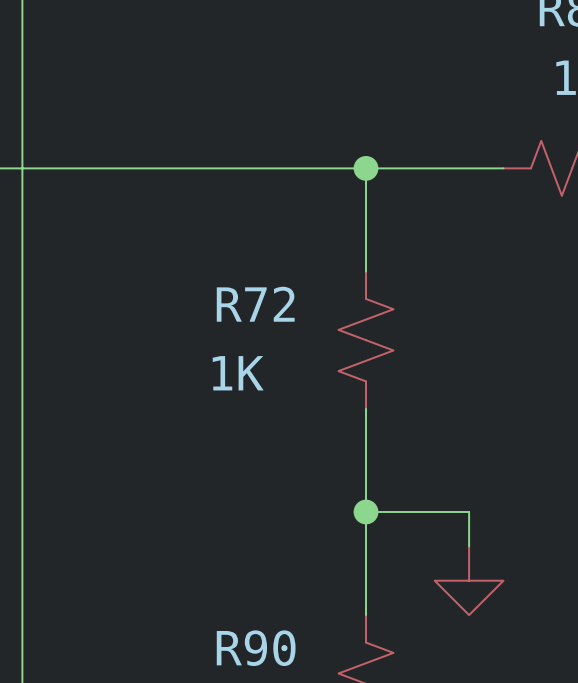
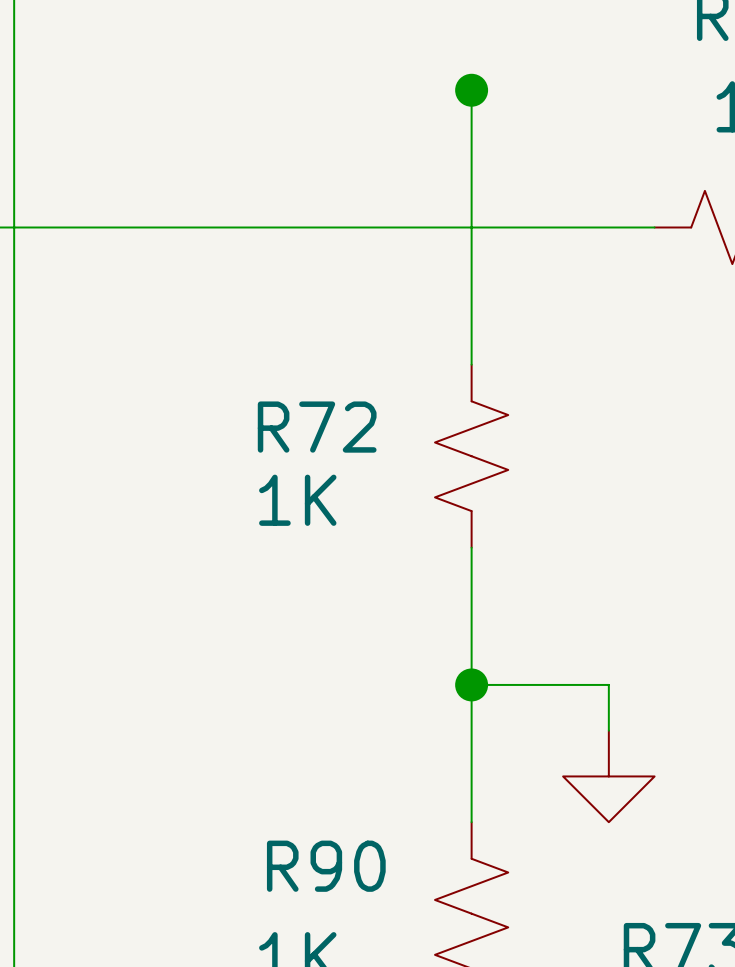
wire: none -> (471, 90) (471, 227)
junction position: (366, 168) -> (471, 90)
R72 name position: R72 (255, 304) -> R72 (317, 427)

